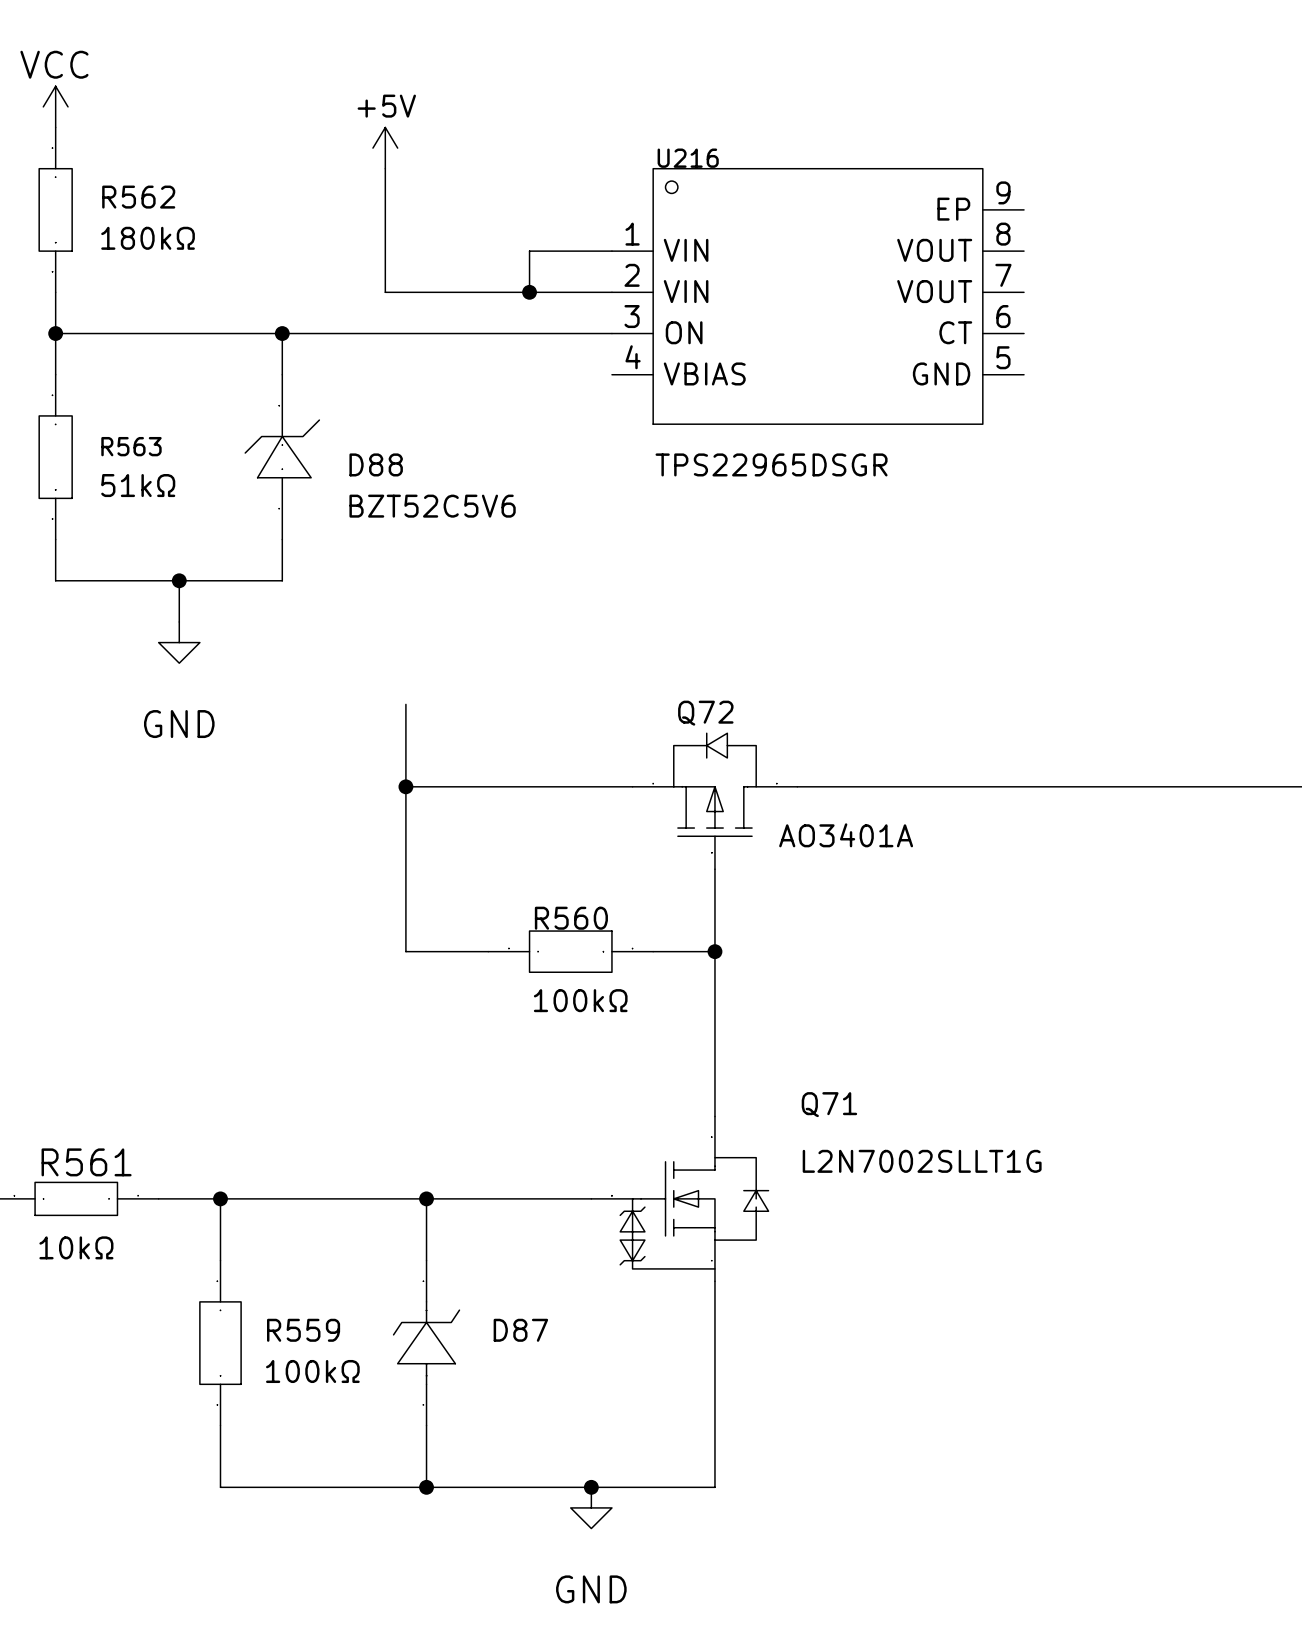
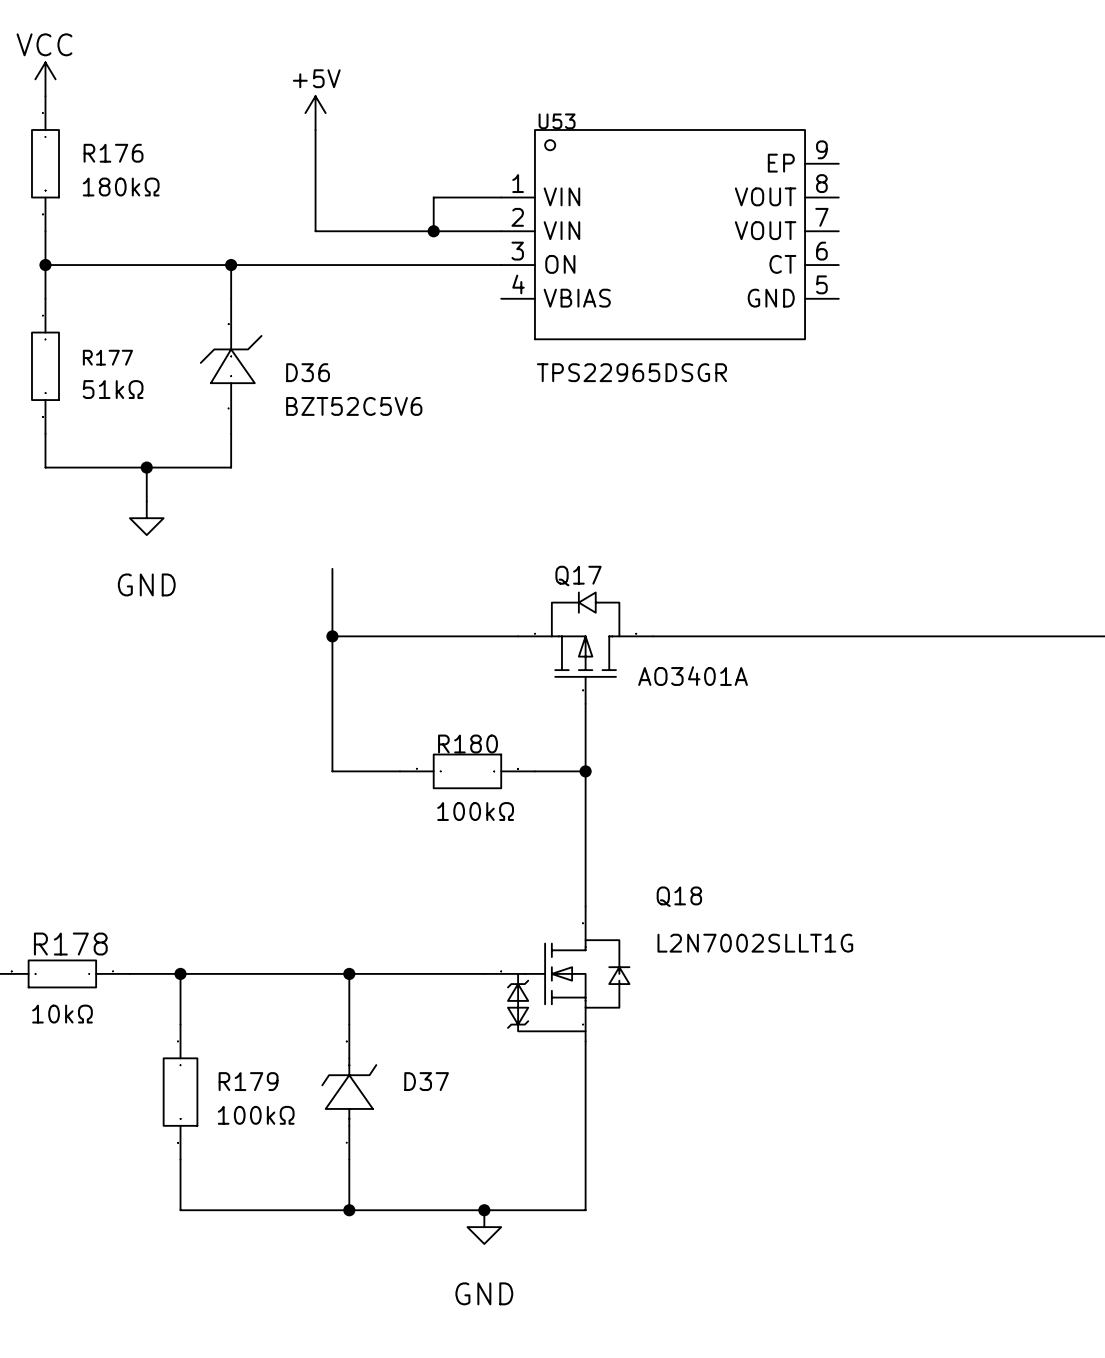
U216 name: U216 (688, 158) -> U53 (557, 121)
R562 name: R562 (138, 197) -> R176 (113, 153)
R563 name: R563 (131, 446) -> R177 (107, 357)
D88 name: D88 (376, 464) -> D36 (308, 372)
Q72 name: Q72 (705, 713) -> Q17 (578, 576)
R560 name: R560 (571, 918) -> R180 (467, 744)
Q71 name: Q71 (829, 1104) -> Q18 (679, 896)
R561 name: R561 (86, 1162) -> R178 (70, 944)
R559 name: R559 (303, 1330) -> R179 (248, 1081)
D87 name: D87 (520, 1330) -> D37 (426, 1081)

